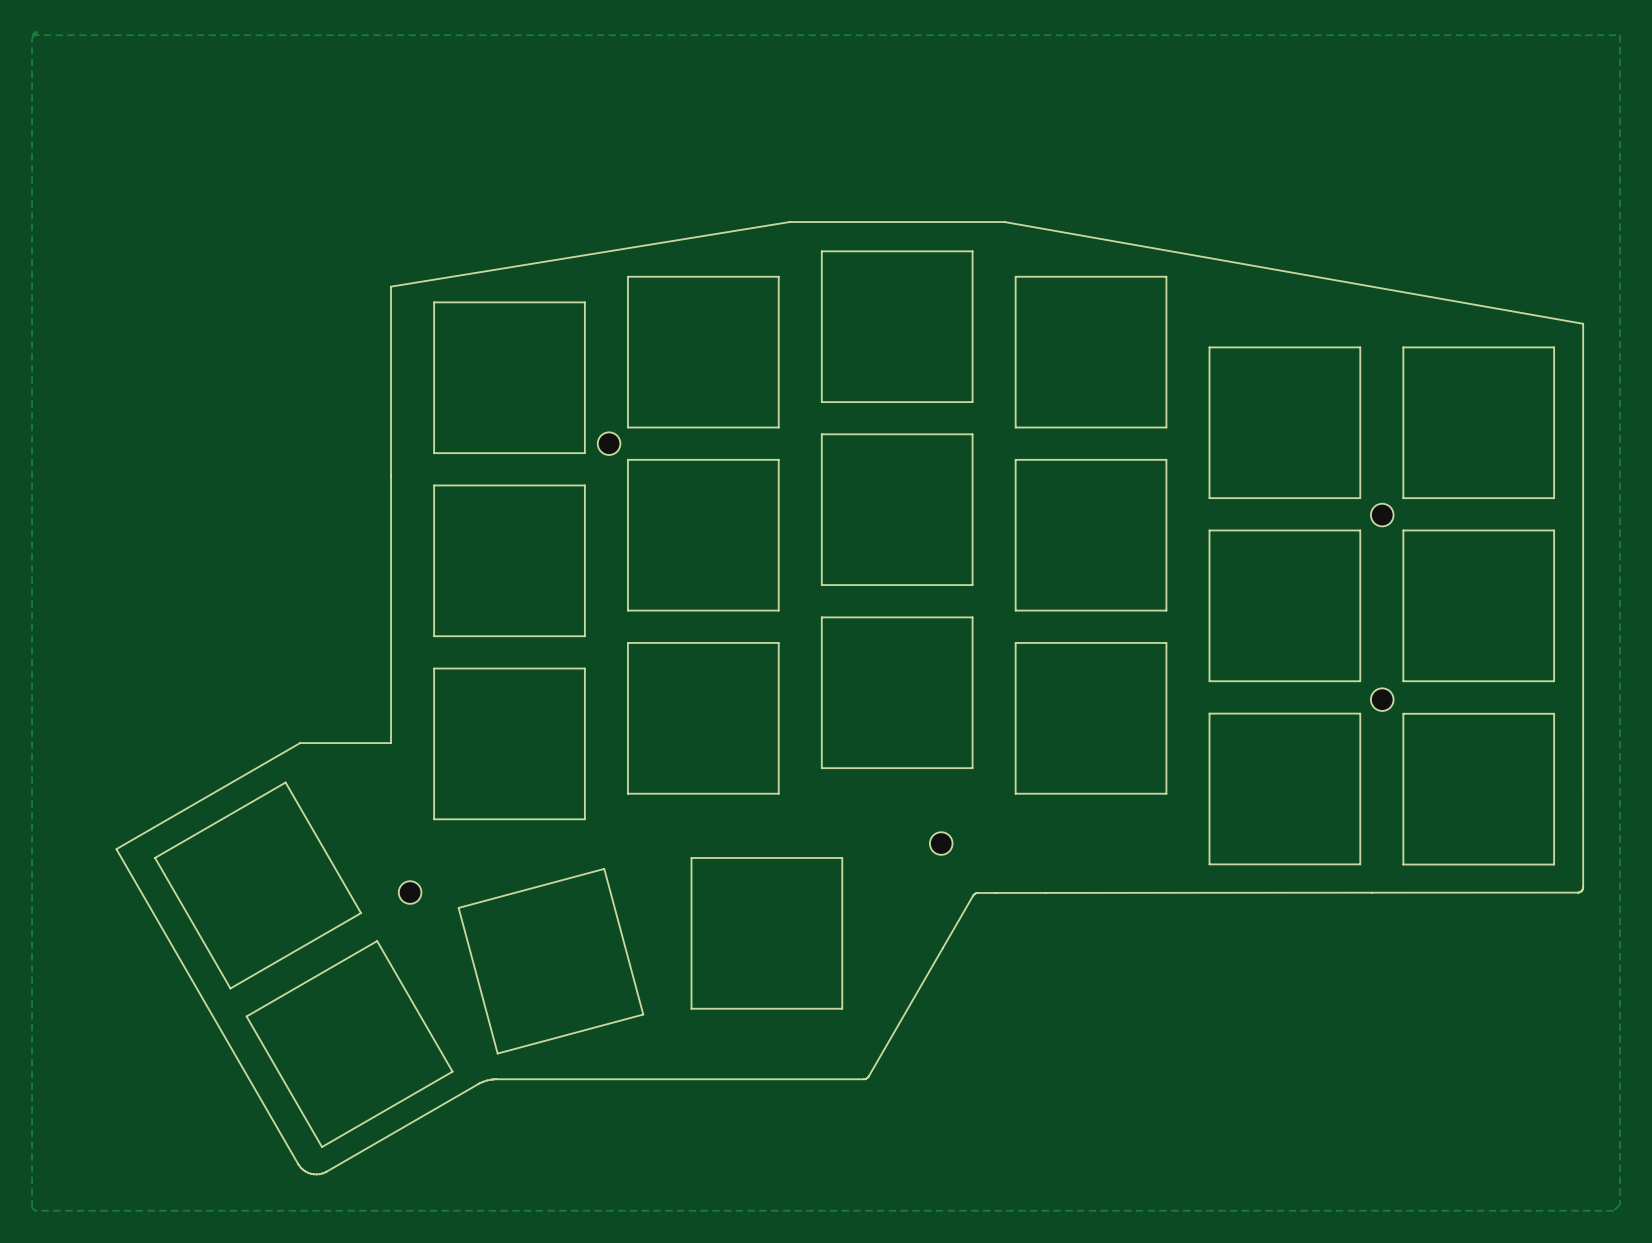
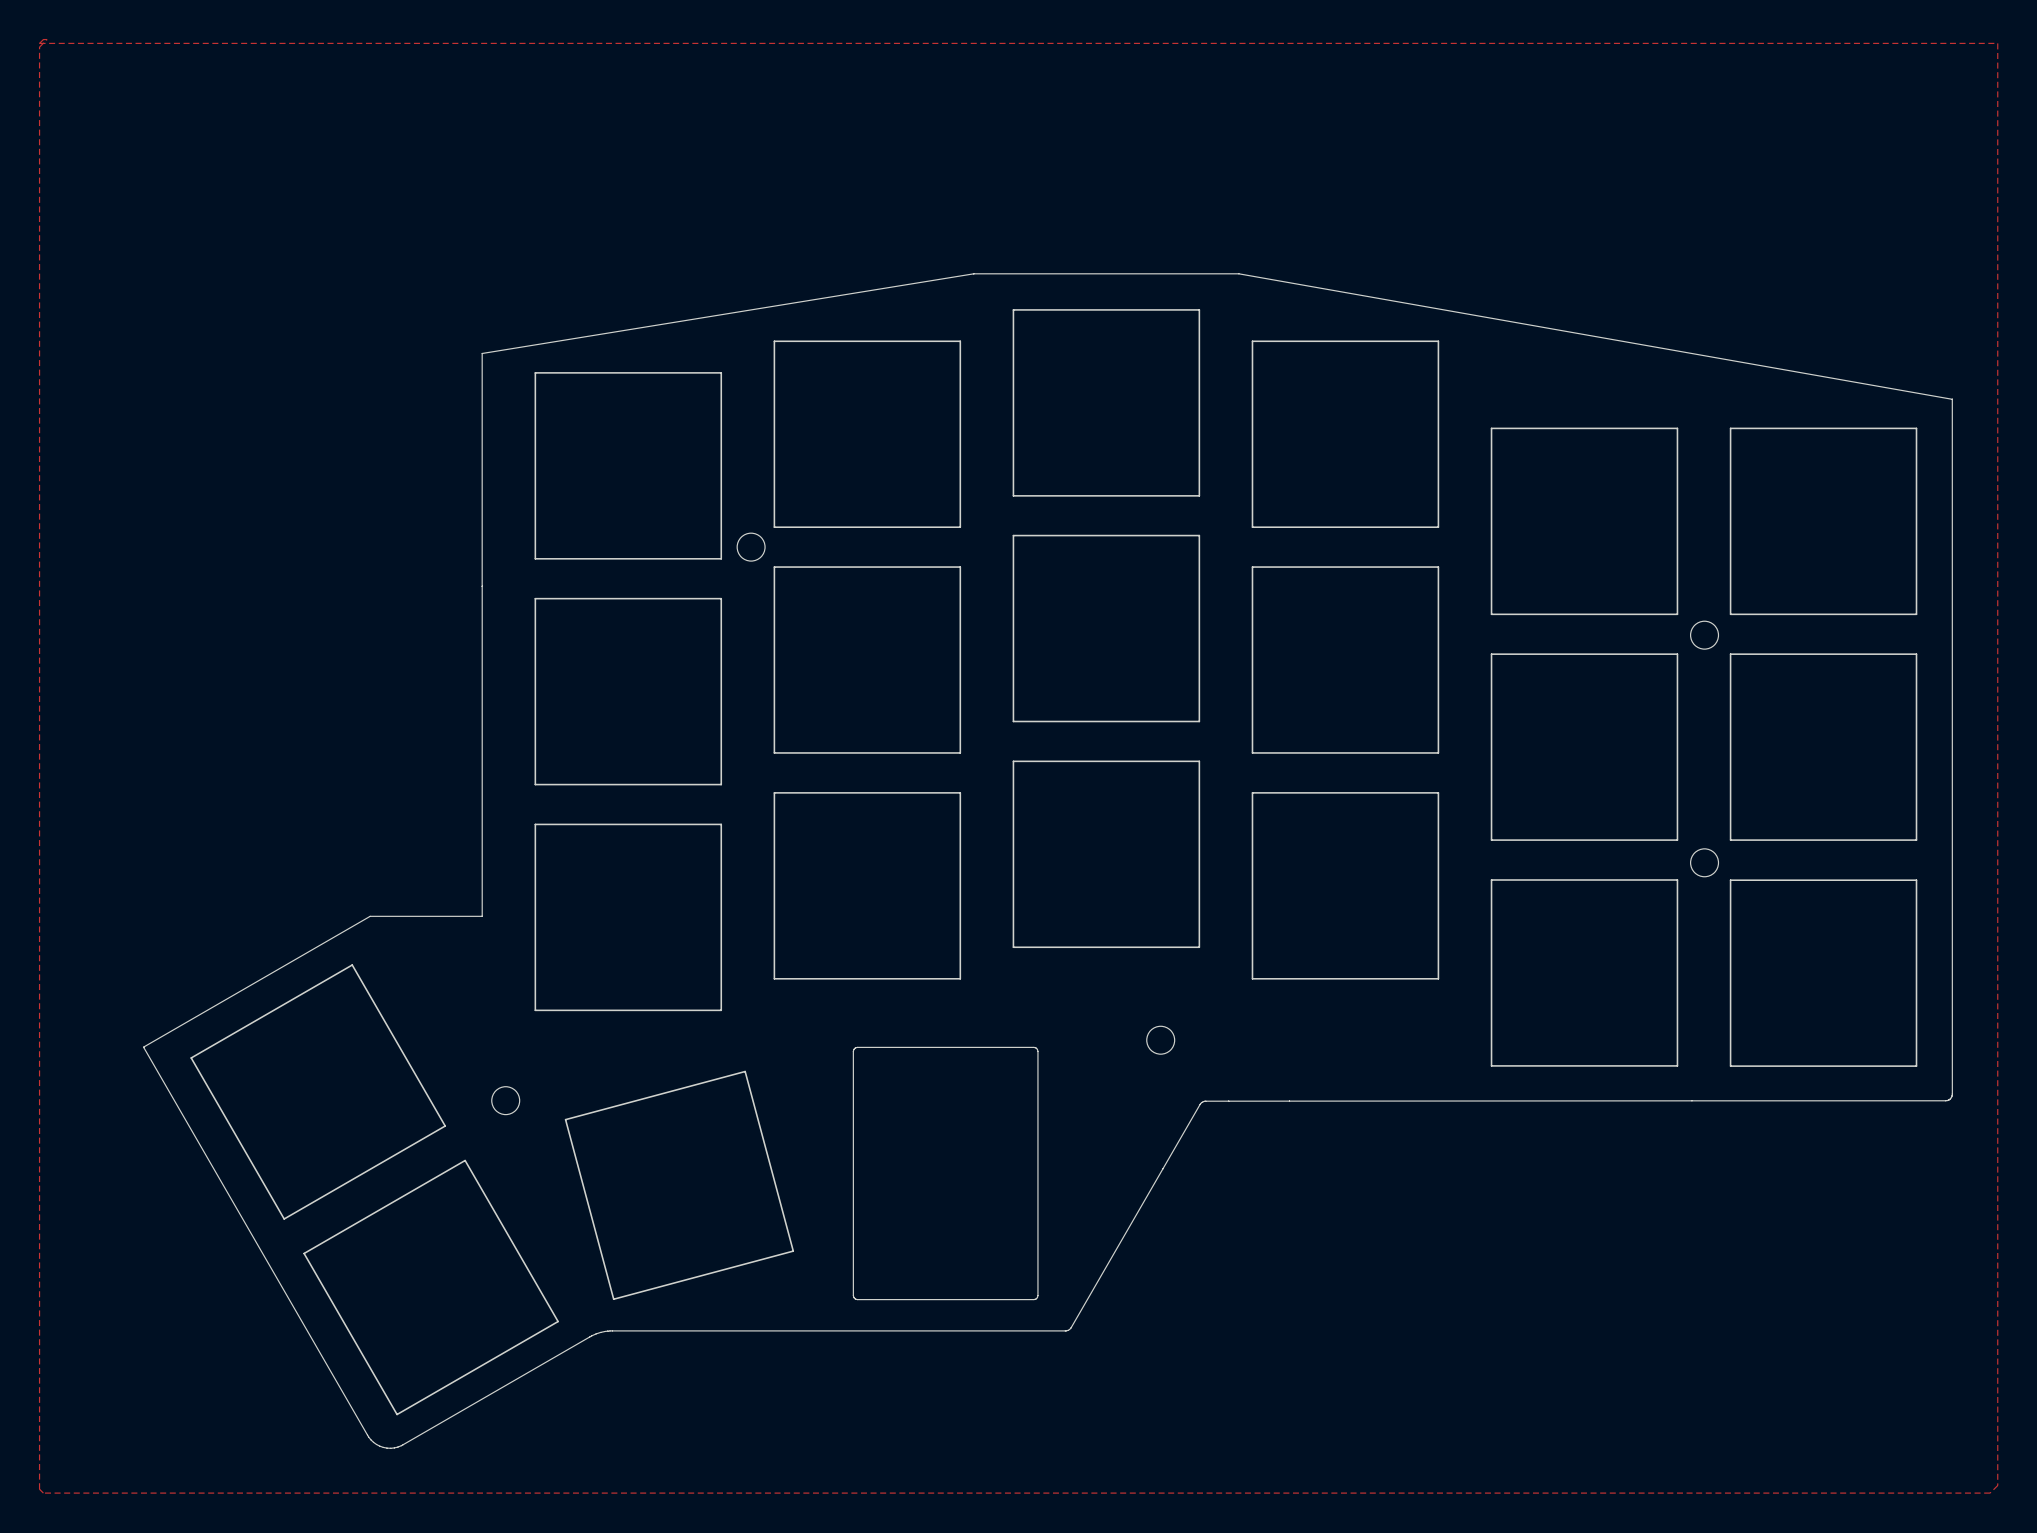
board edge: none -> (857, 1047) (853, 1051) (853, 1297) (857, 1299) (1035, 1299) (1037, 1295) (1037, 1049) (1033, 1047) (857, 1047)
drawing: [690, 857, 843, 1010] -> none

